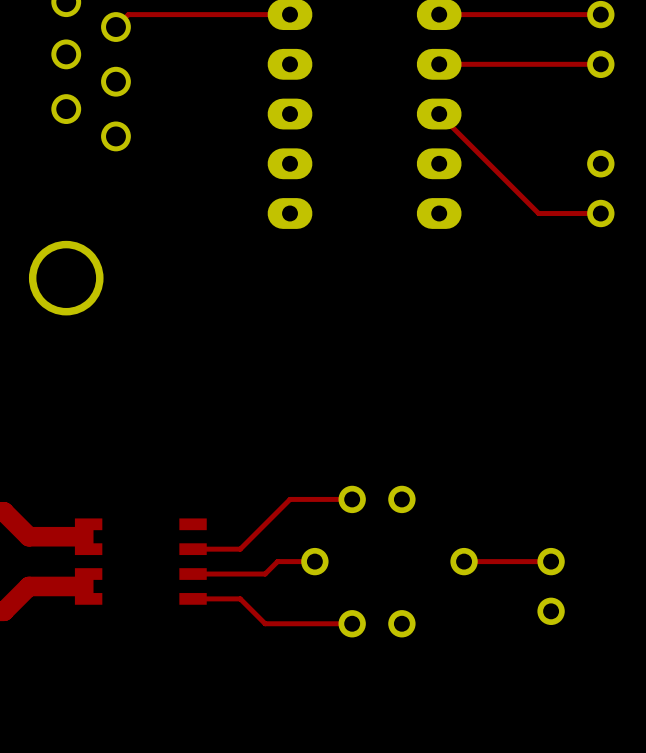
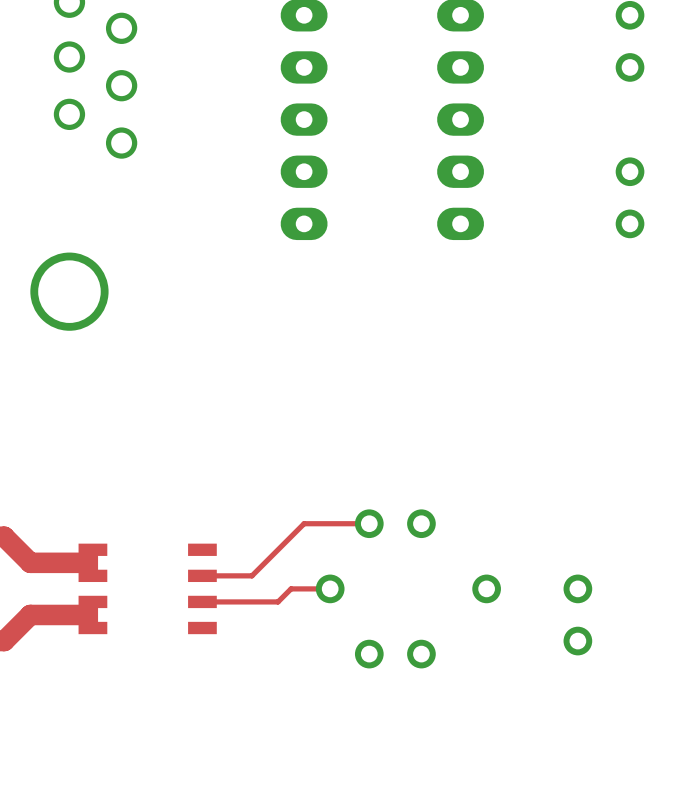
top track: (290, 14) (128, 14) (115, 27) -> none
top track: (600, 14) (439, 14) -> none
top track: (600, 64) (439, 64) -> none
top track: (439, 114) (538, 213) (600, 213) -> none
top track: (551, 561) (464, 561) -> none
top track: (193, 598) (240, 598) (265, 623) (352, 623) -> none

